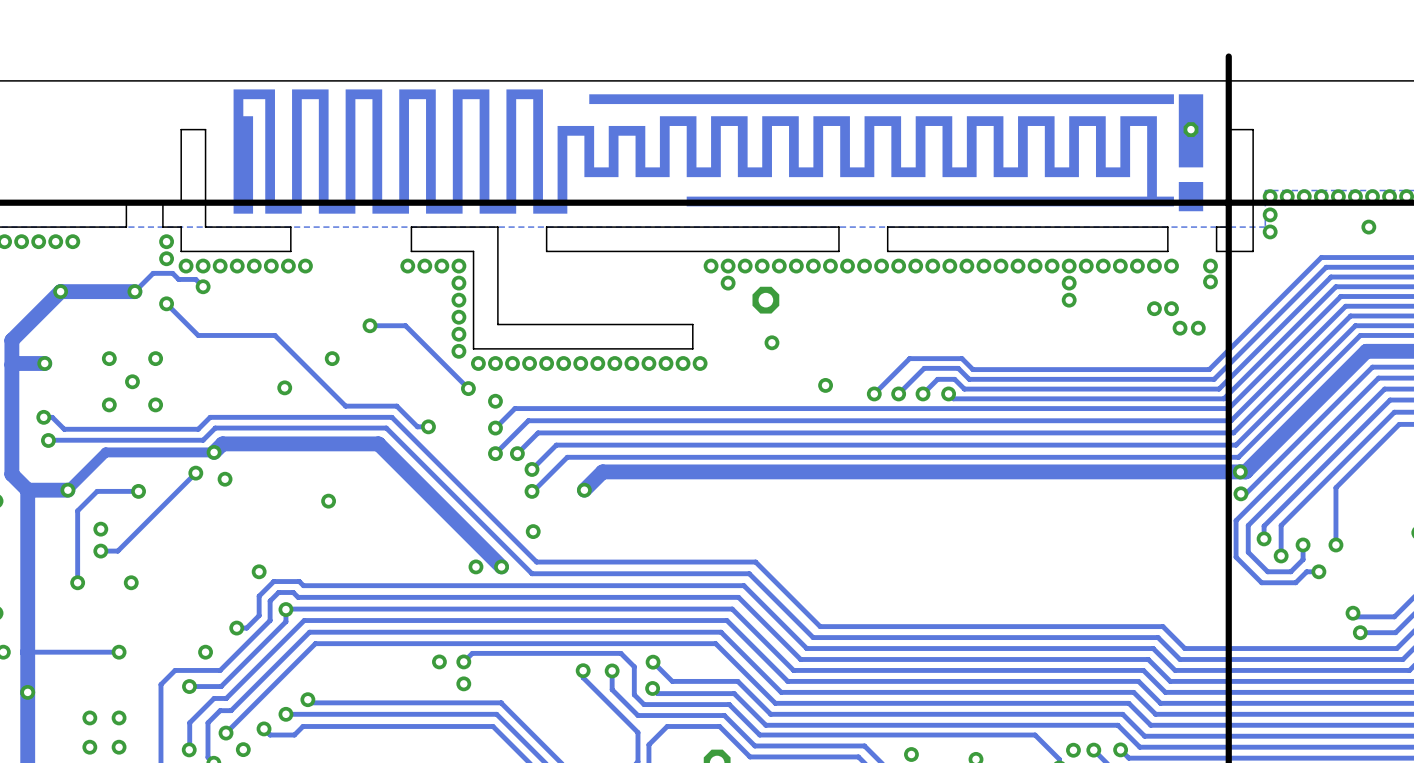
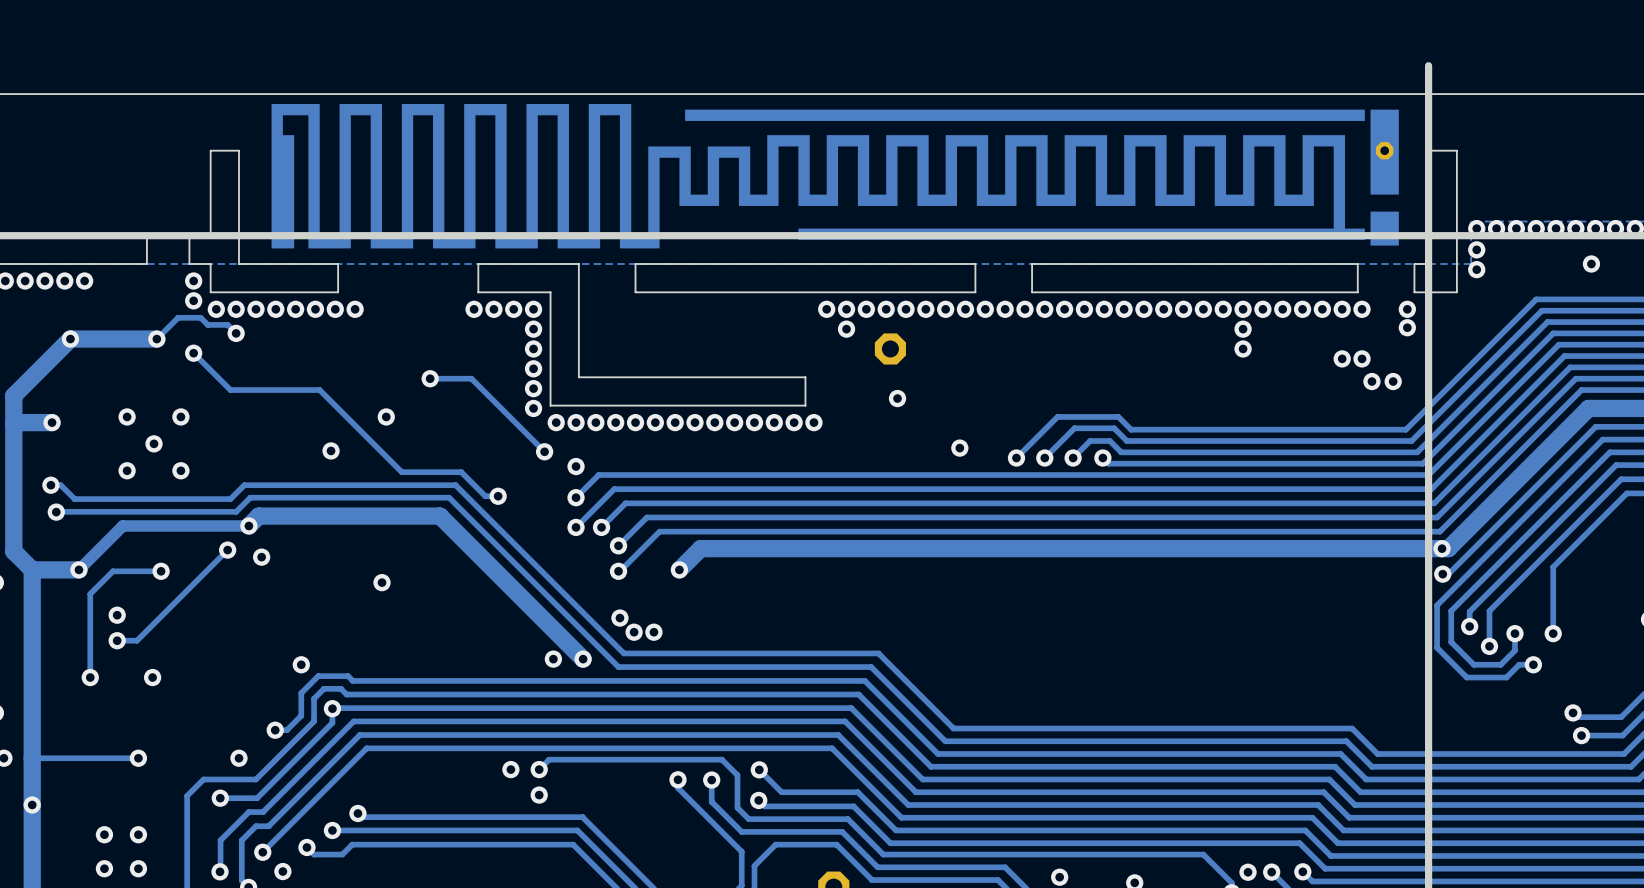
via: none -> (634, 632)
via: none -> (653, 632)

